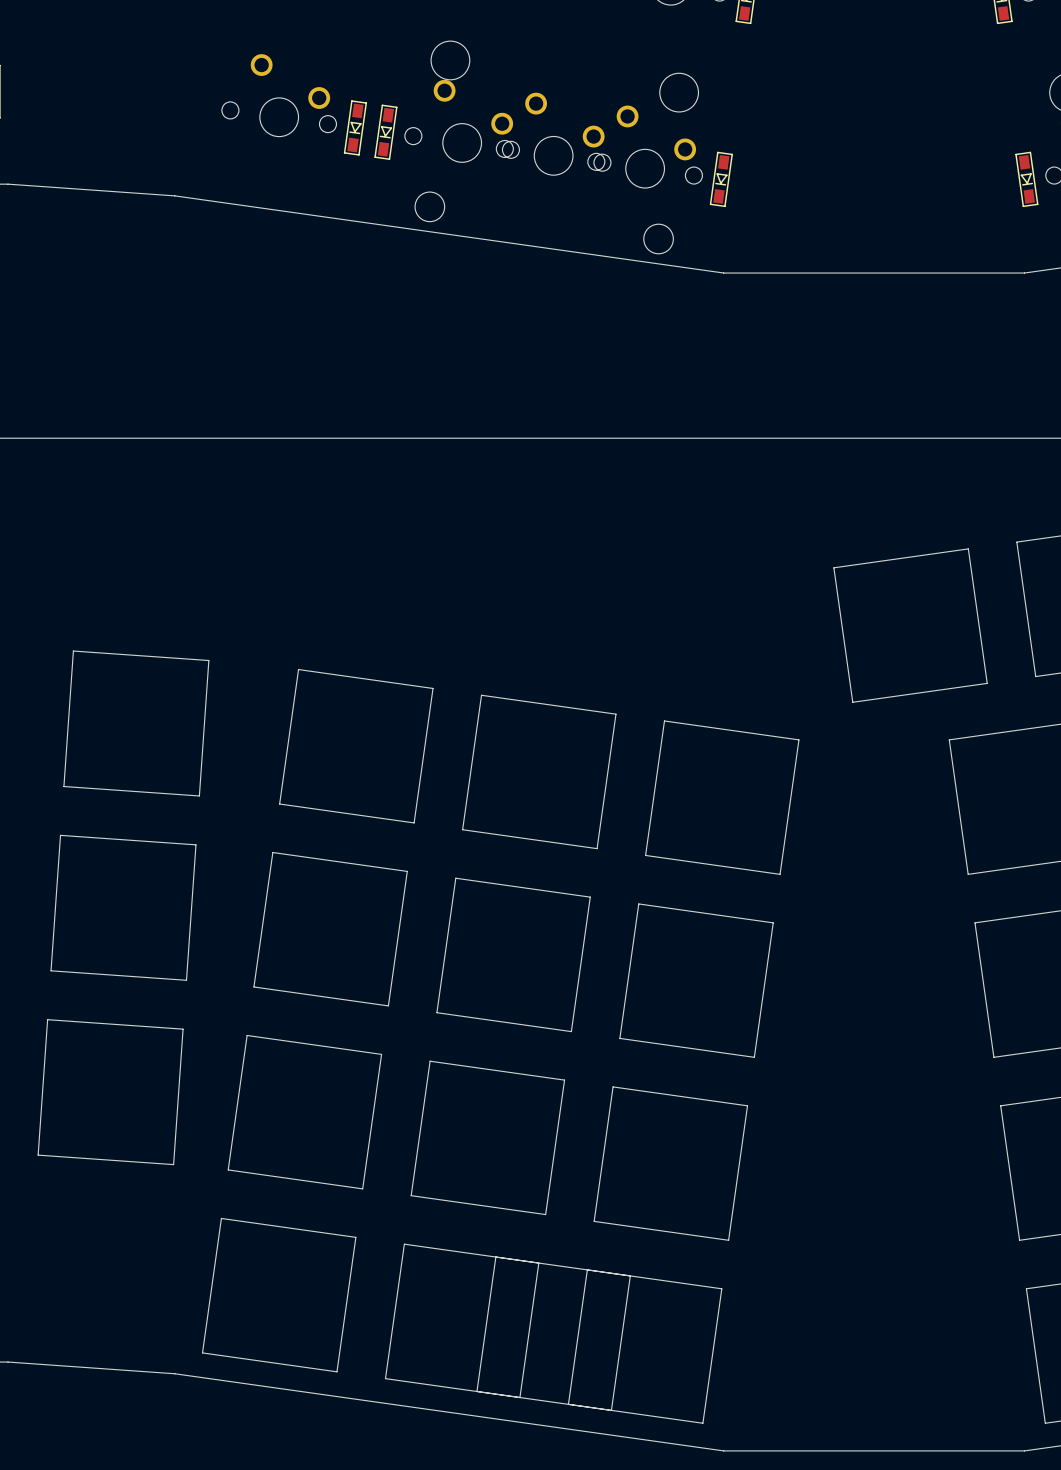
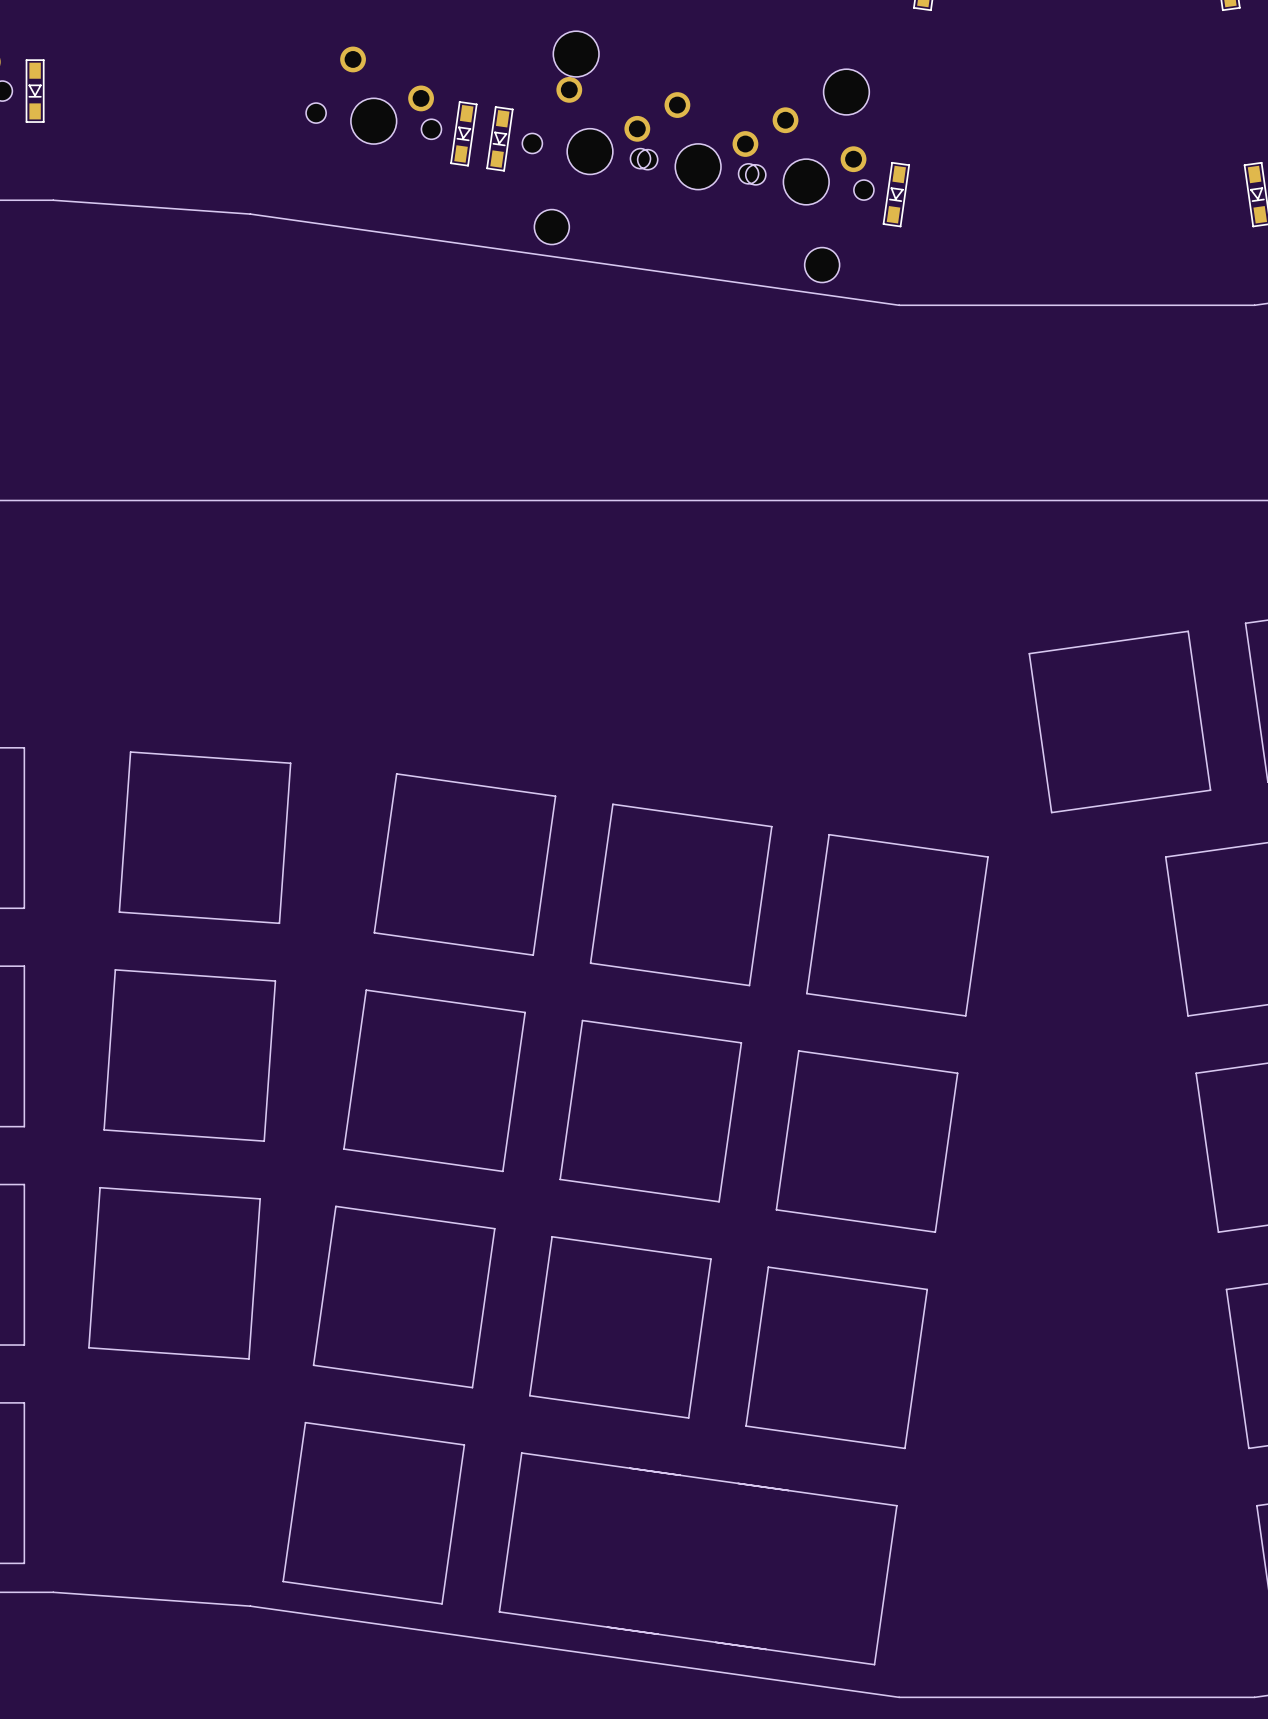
board edge: (495, 1257) (476, 1391) -> none
board edge: (538, 1263) (519, 1397) -> none
board edge: (587, 1269) (568, 1404) -> none
board edge: (630, 1275) (611, 1410) -> none

